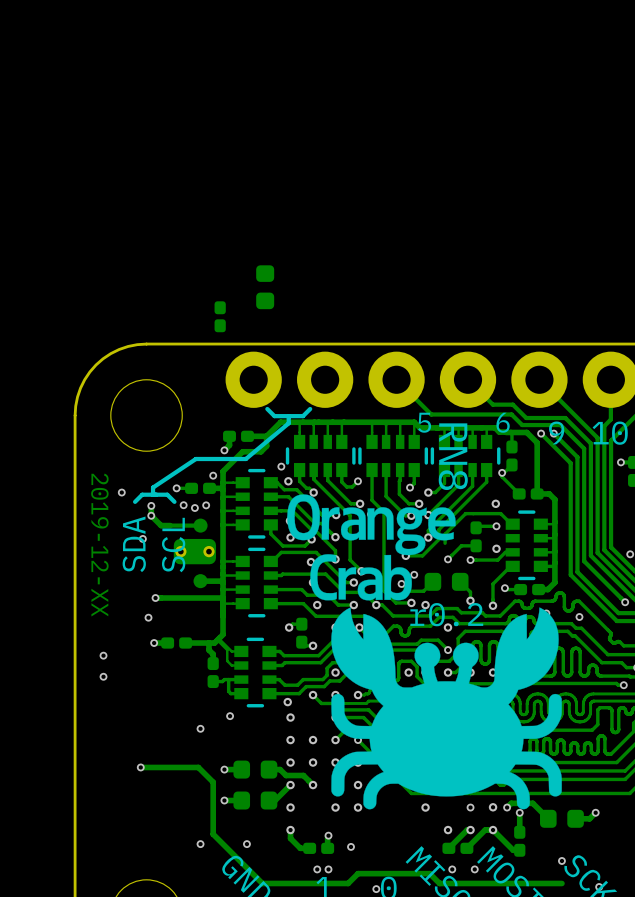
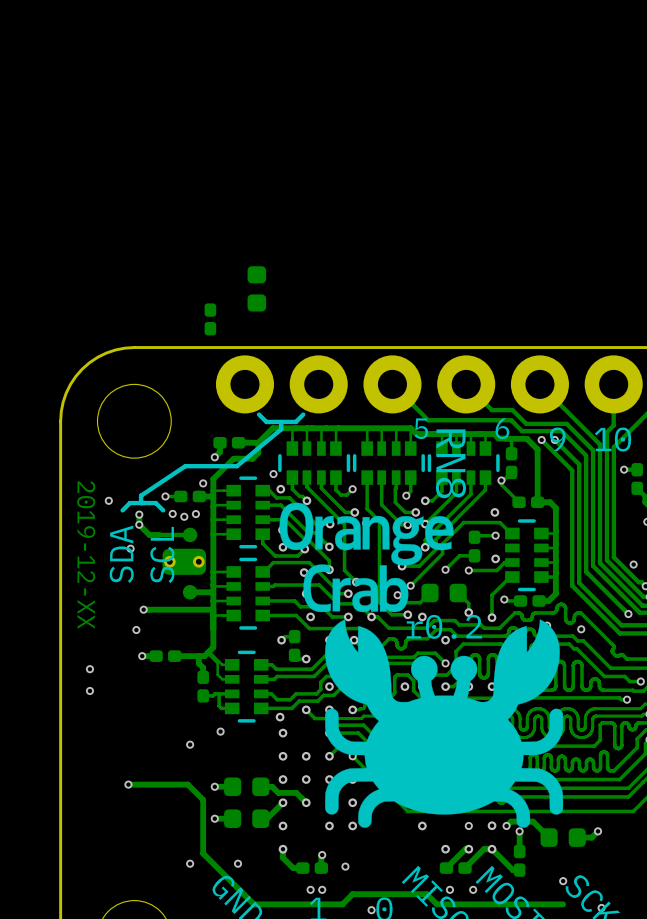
track: none -> (442, 553) (410, 585)

